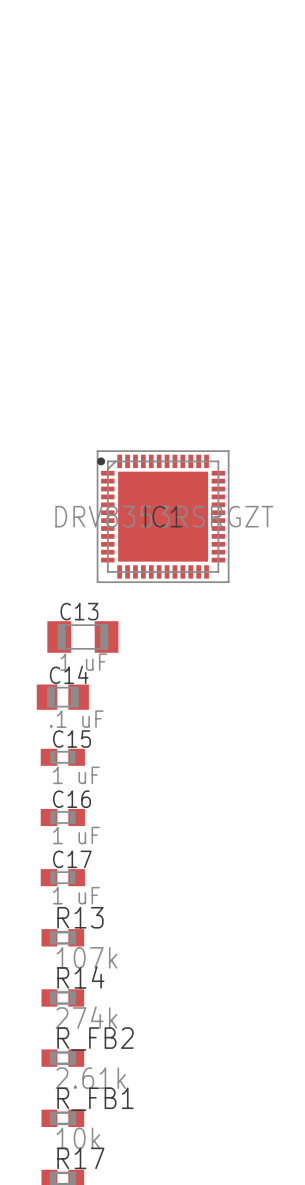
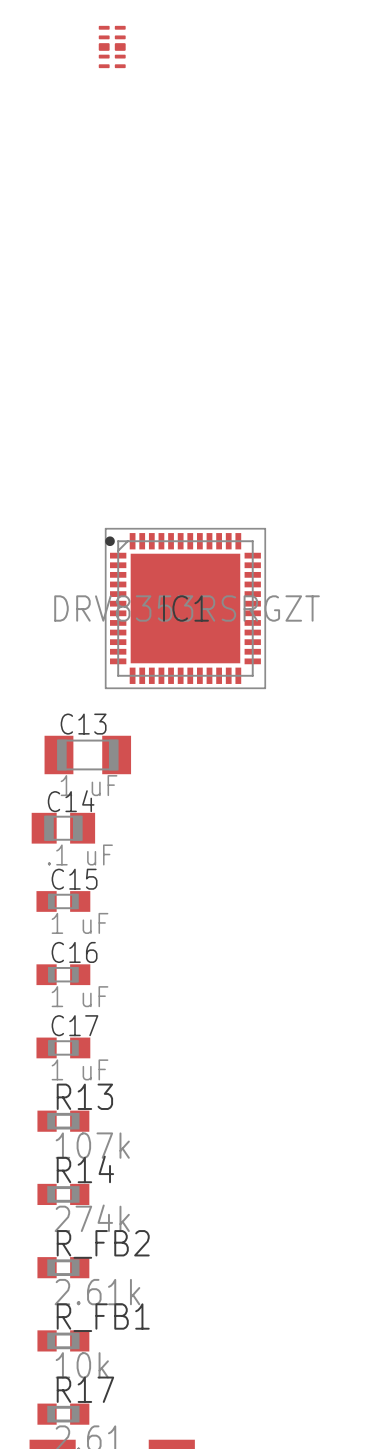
part: none -> (112, 46)

